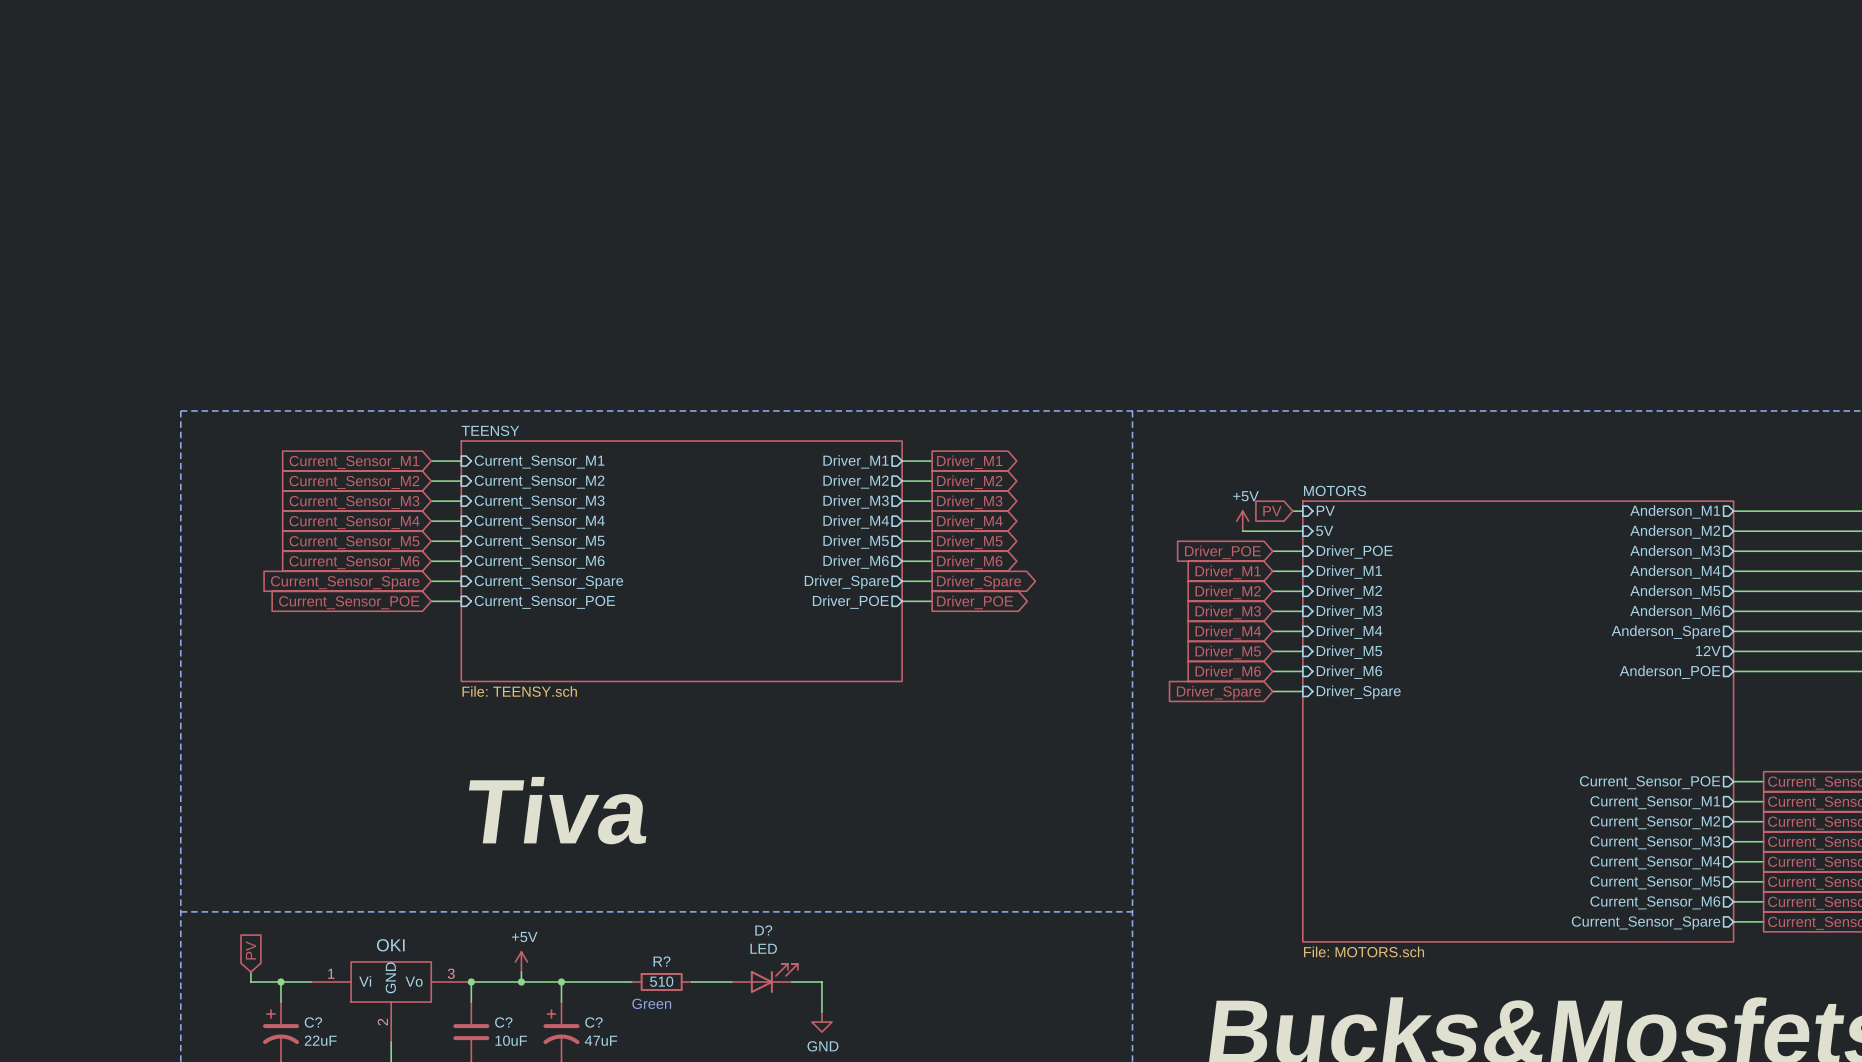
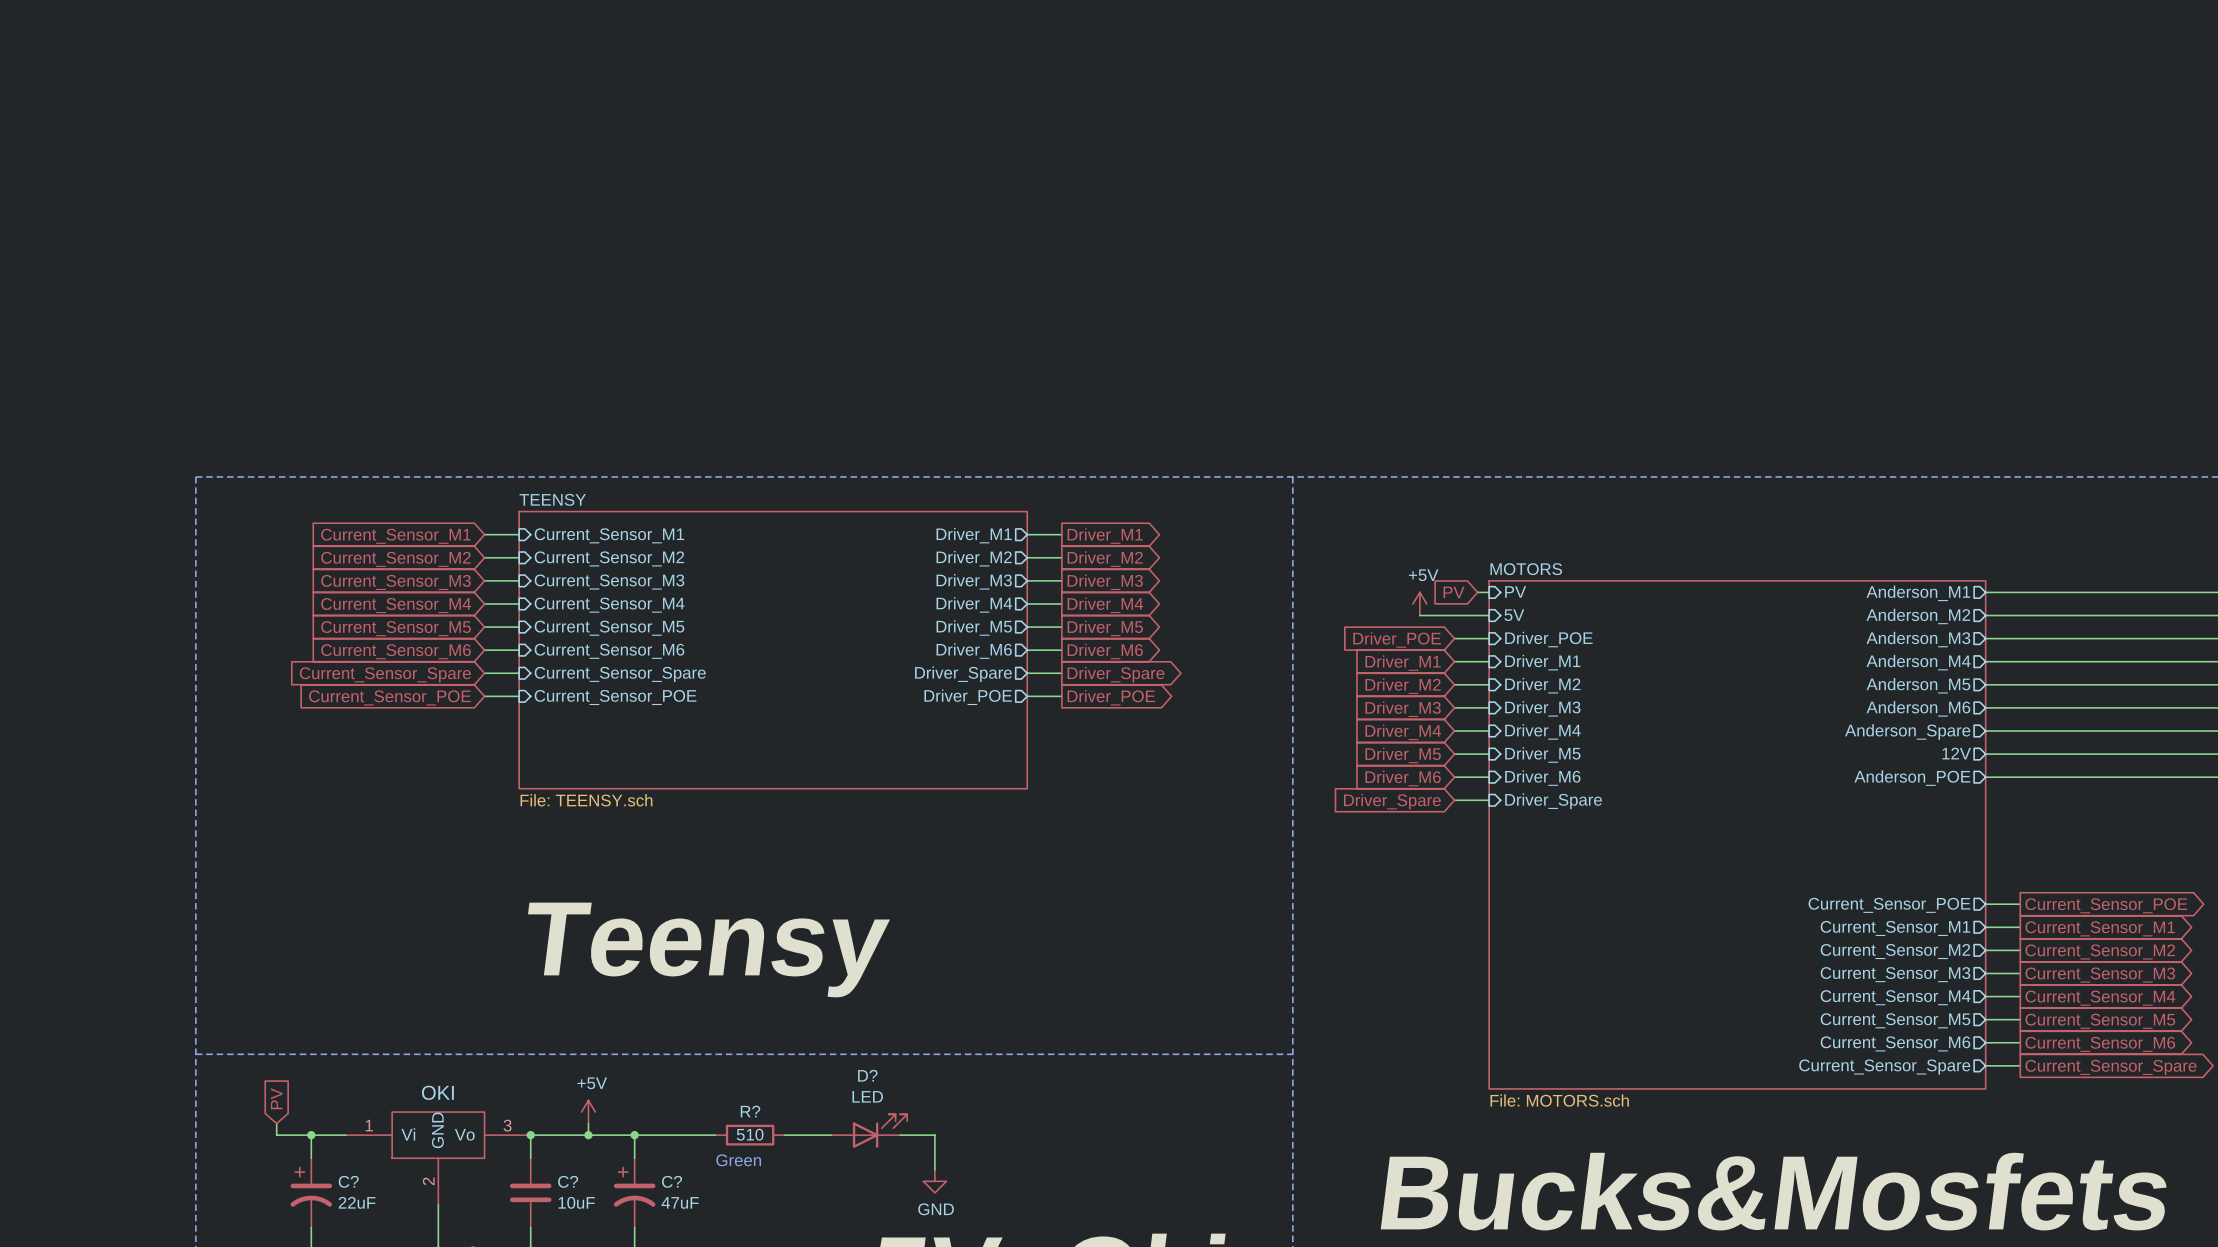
label: Tiva (557, 810) -> Teensy (709, 949)

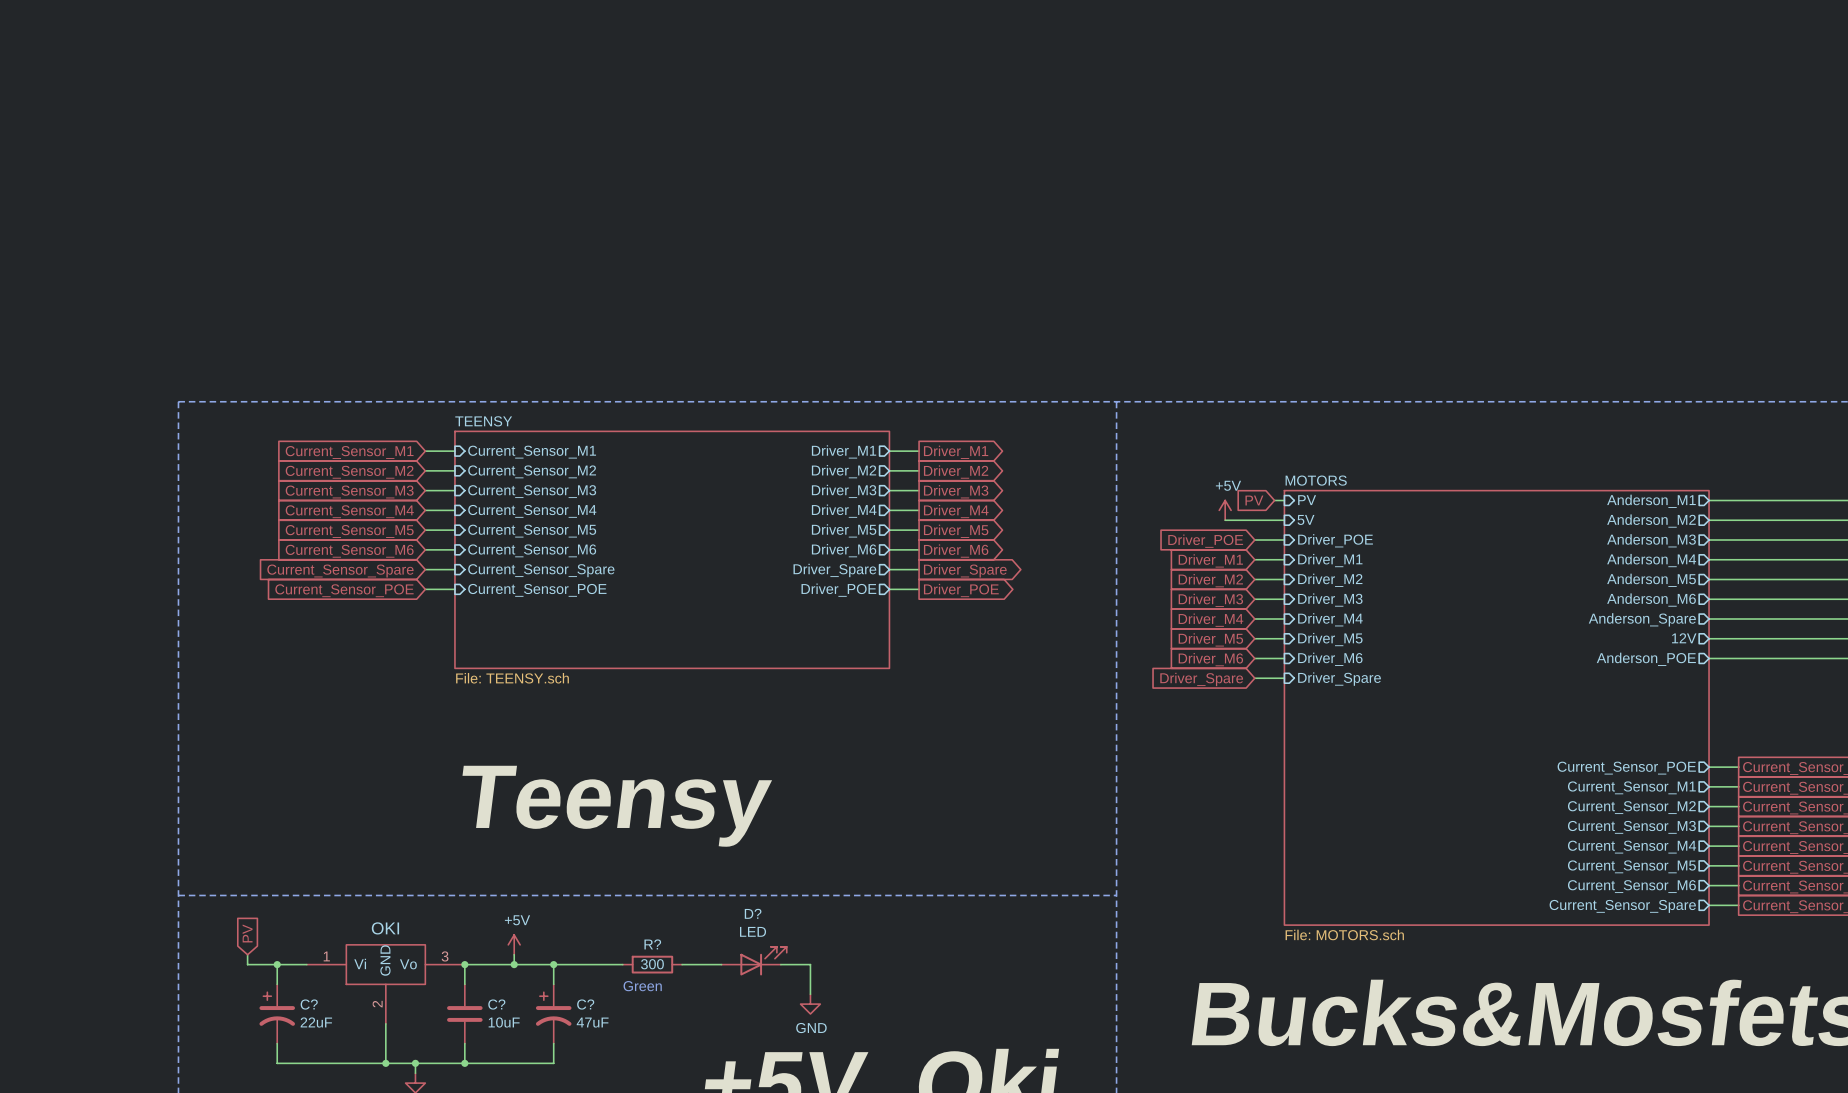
R? value: 510 (750, 1134) -> 300 (652, 964)

